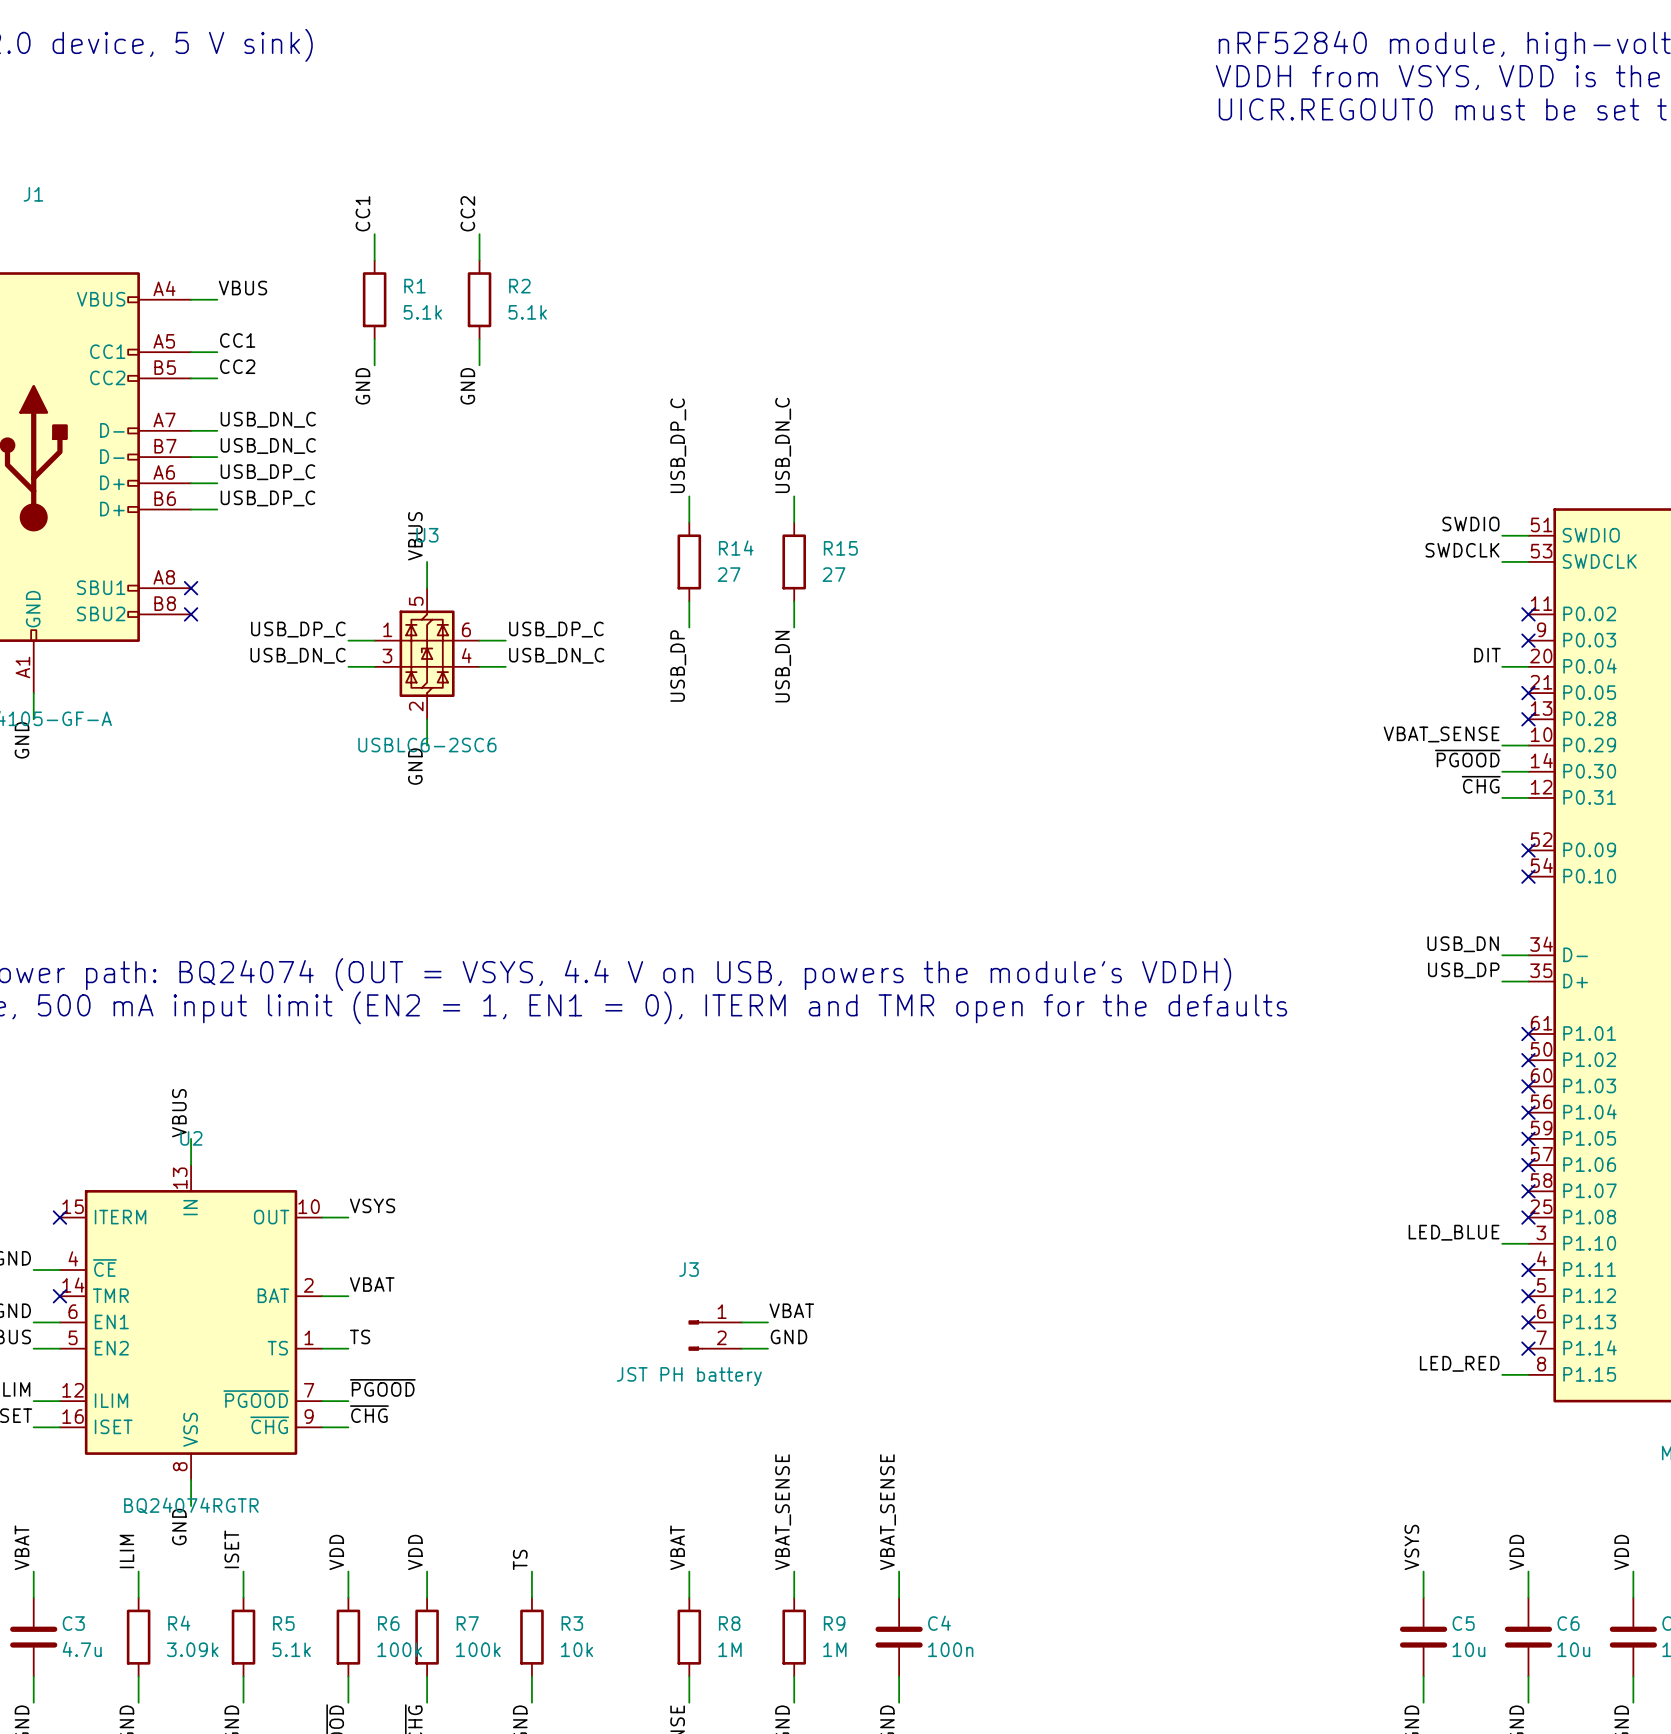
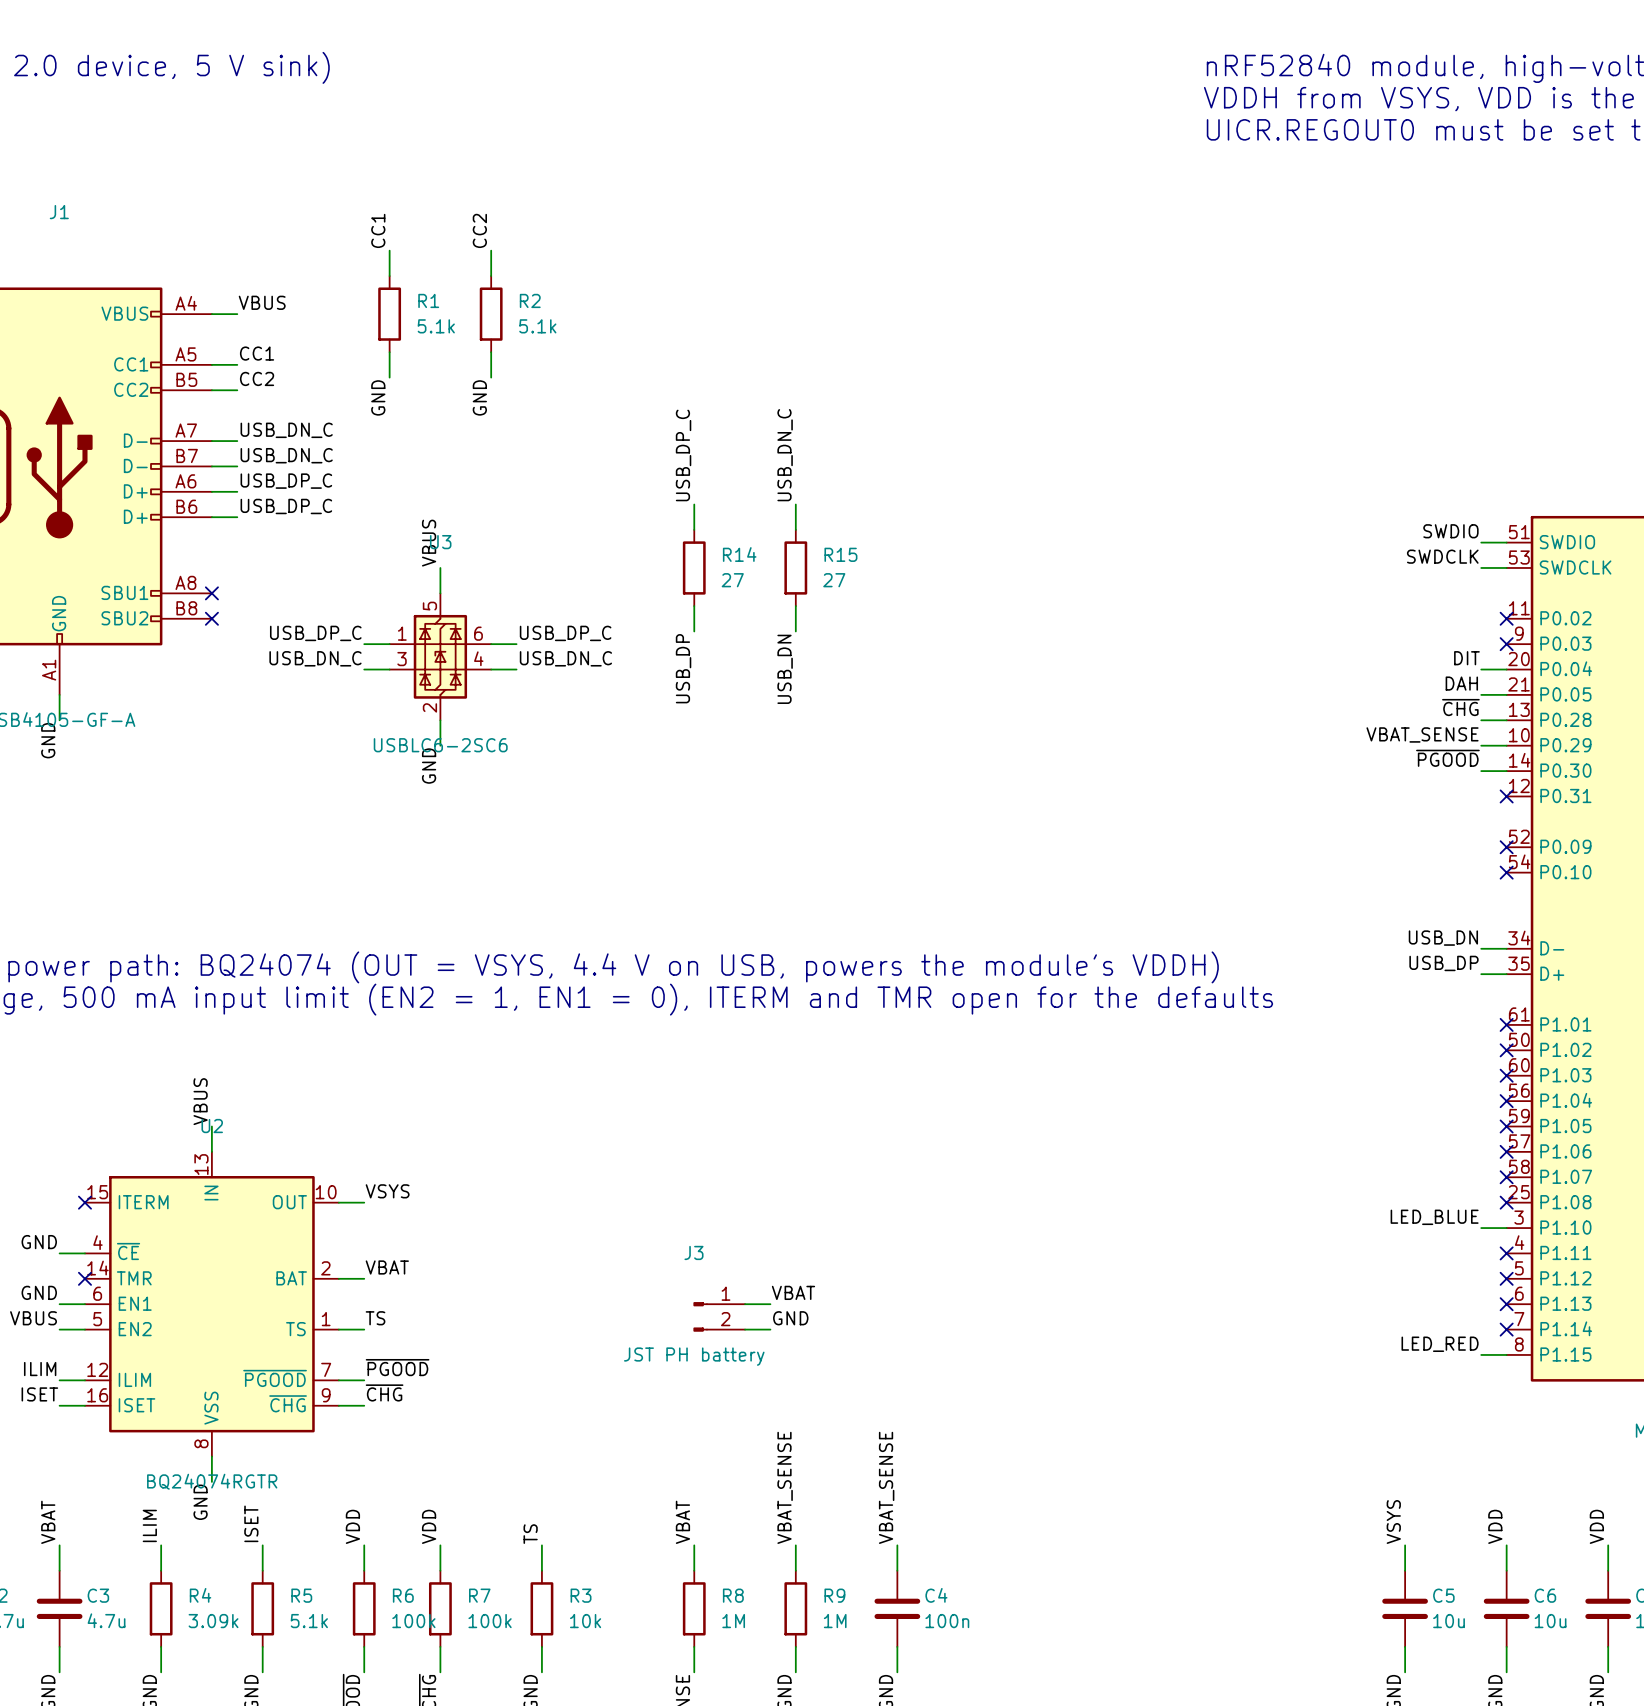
label: none -> DAH (1461, 683)
wire: none -> (1481, 694) (1506, 694)
no-connect mark: (1528, 693) -> none
no-connect mark: (1528, 719) -> none
label position: ~{CHG} (1481, 784) -> ~{CHG} (1460, 707)
wire: (1502, 797) (1528, 797) -> (1481, 720) (1506, 720)
no-connect mark: none -> (1506, 796)

